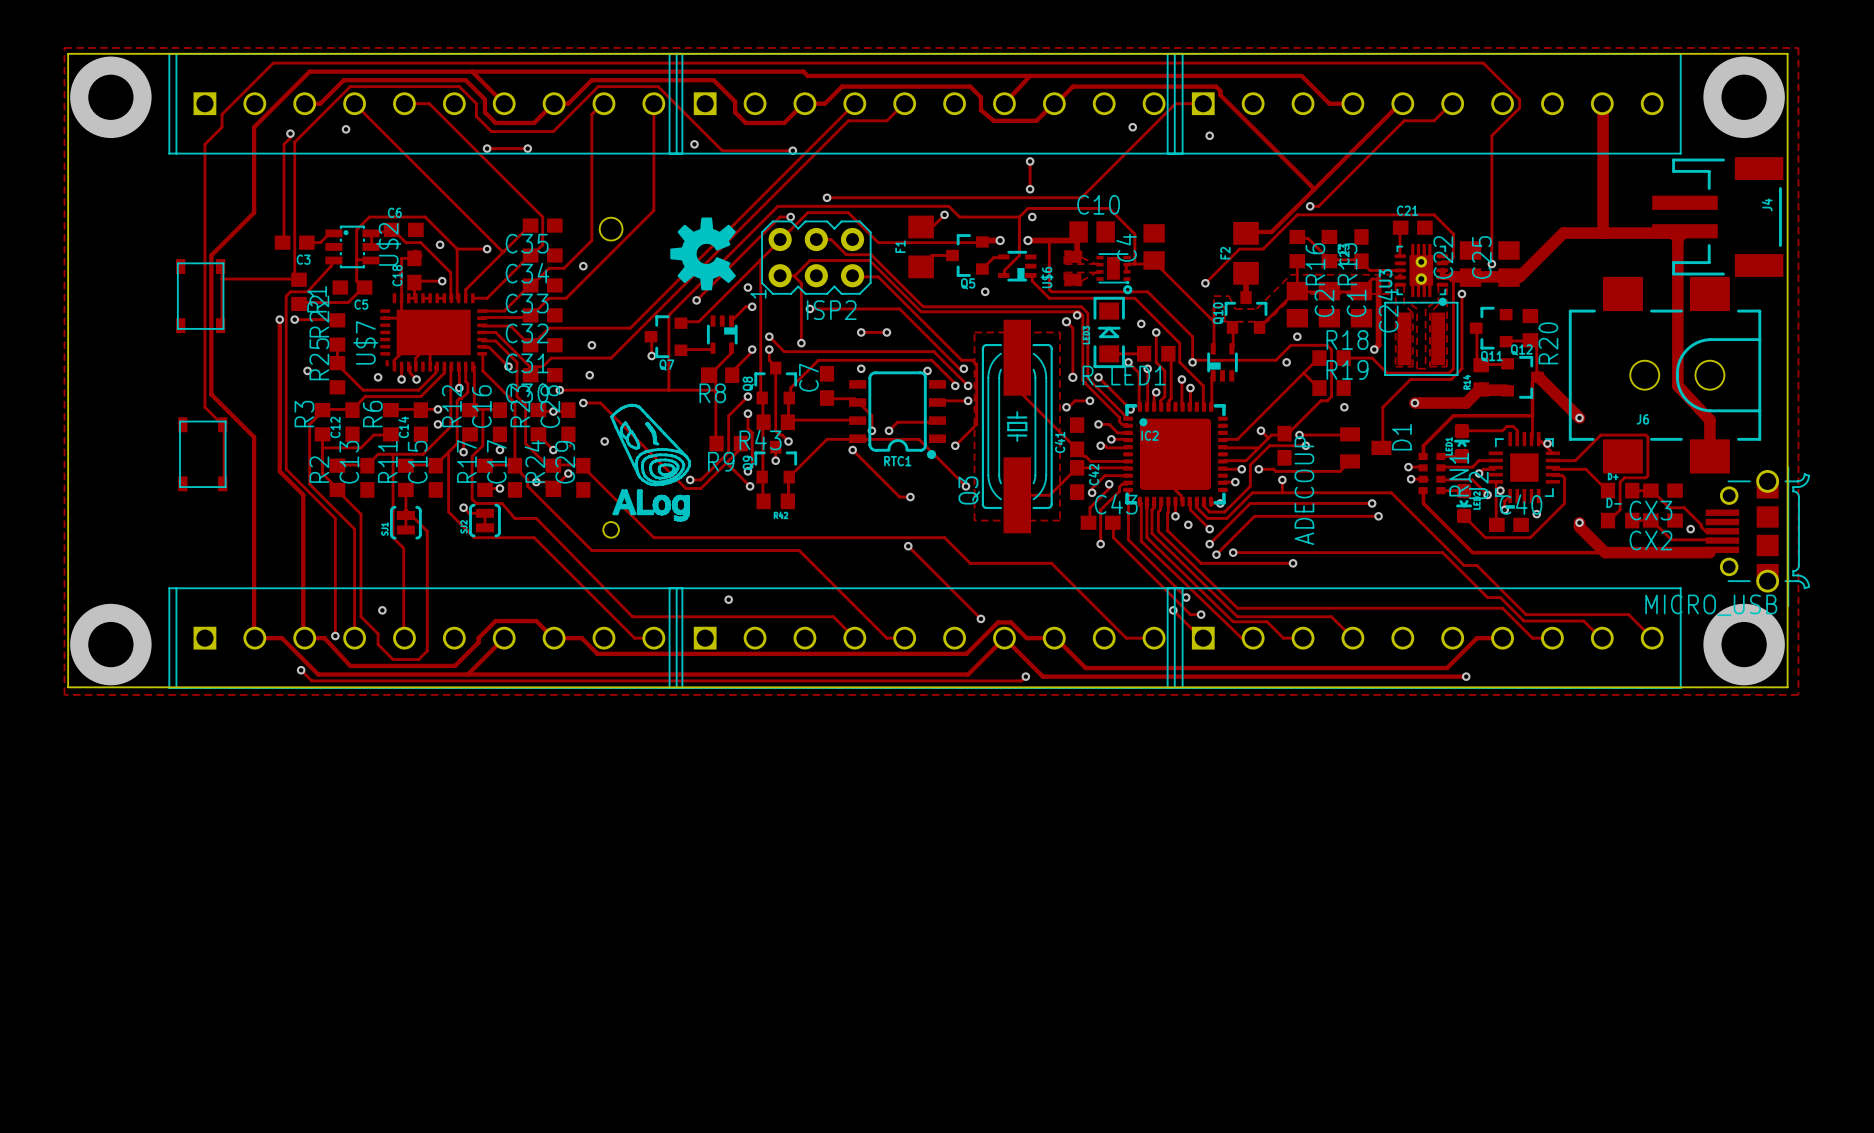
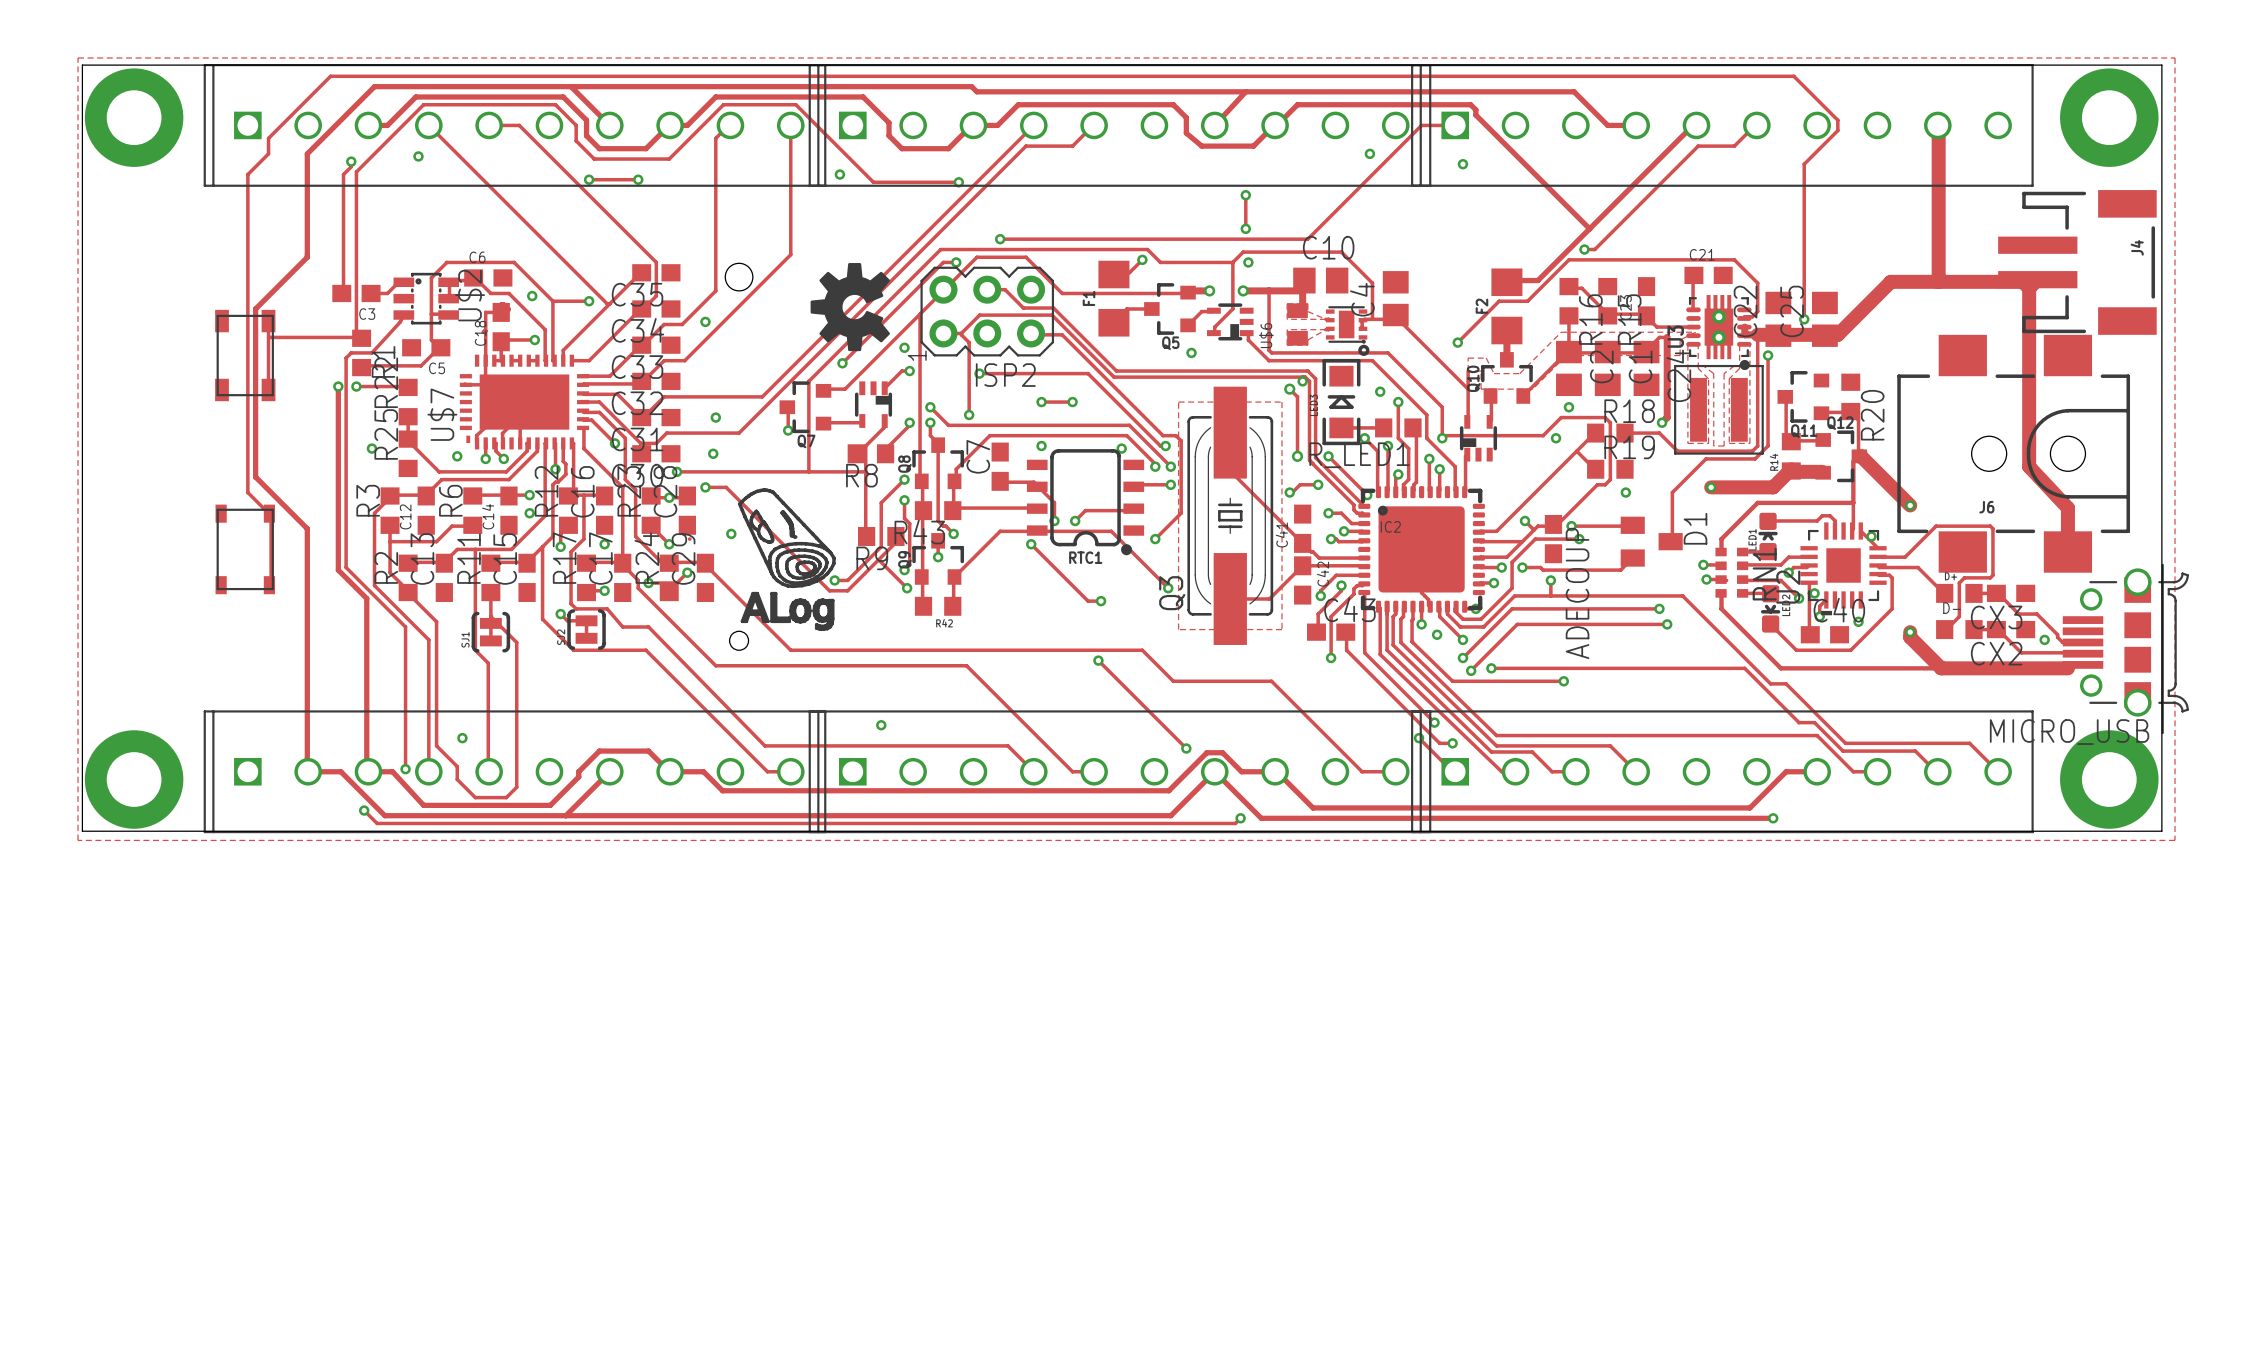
part footprint: [176, 259, 226, 334] -> [215, 309, 276, 402]

